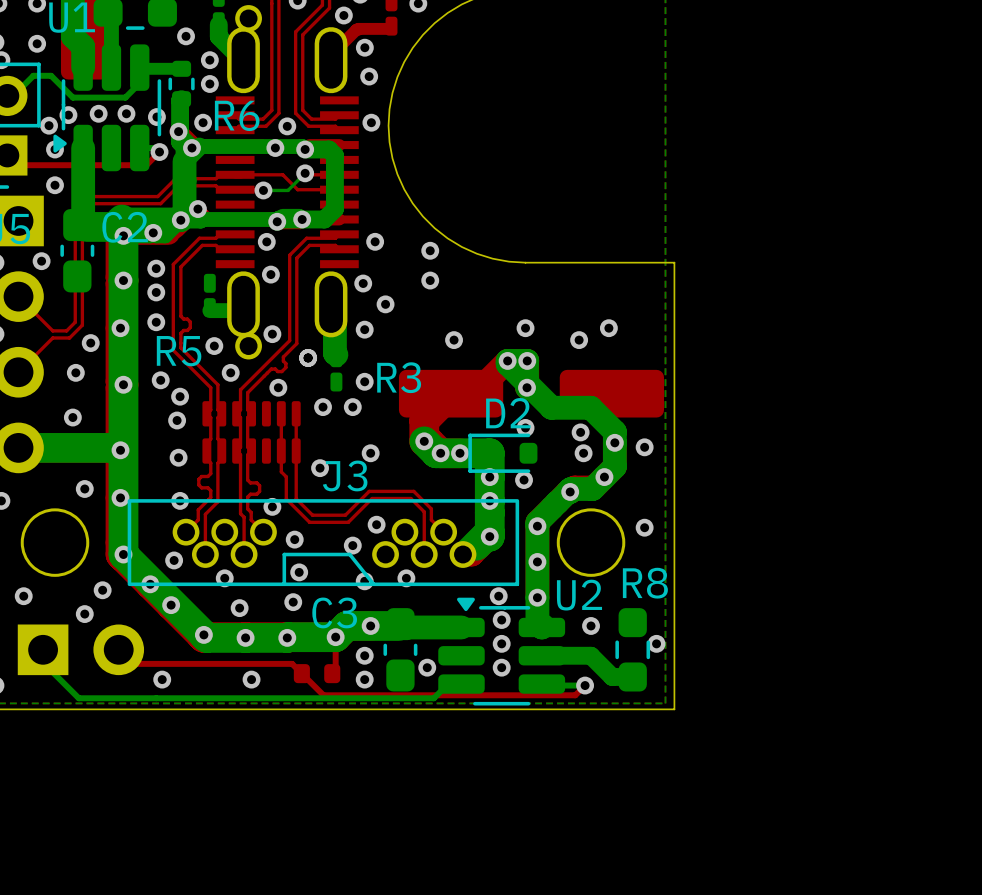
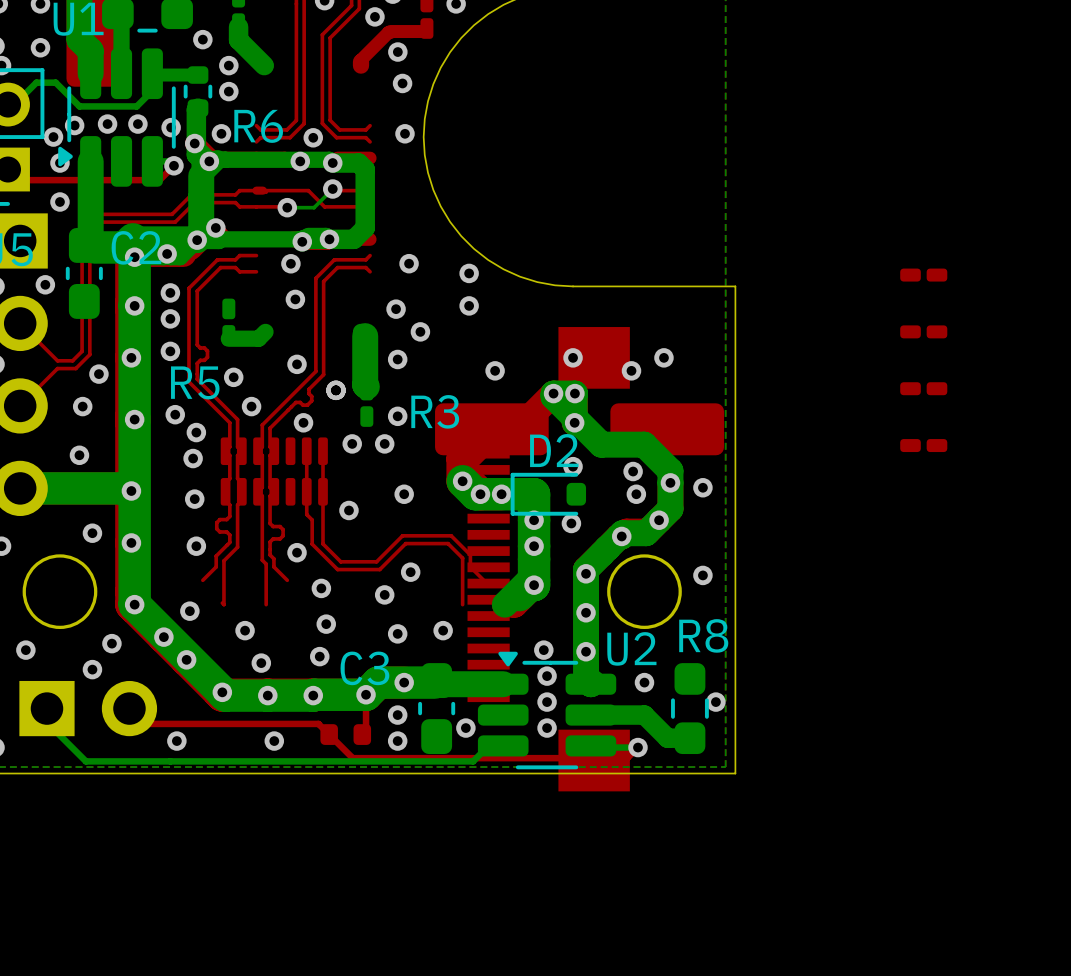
part: (287, 182) -> none
part: none -> (923, 275)
part: none -> (923, 331)
part: none -> (923, 388)
part: none -> (923, 445)
part: none -> (548, 559)
J3: (323, 542) -> none

